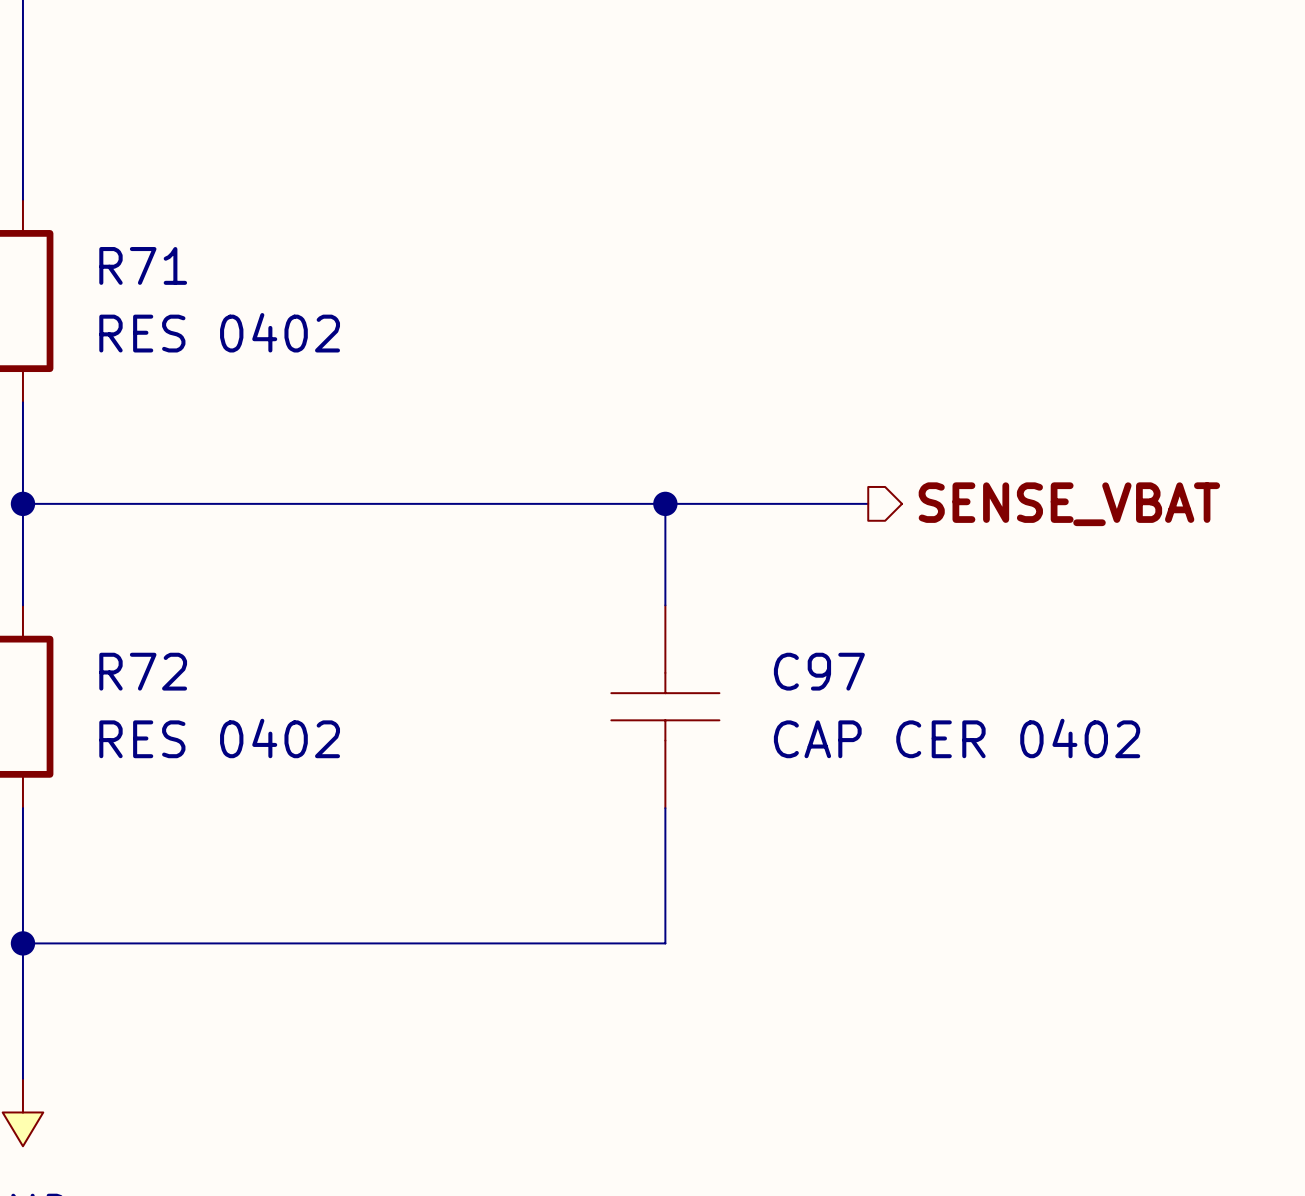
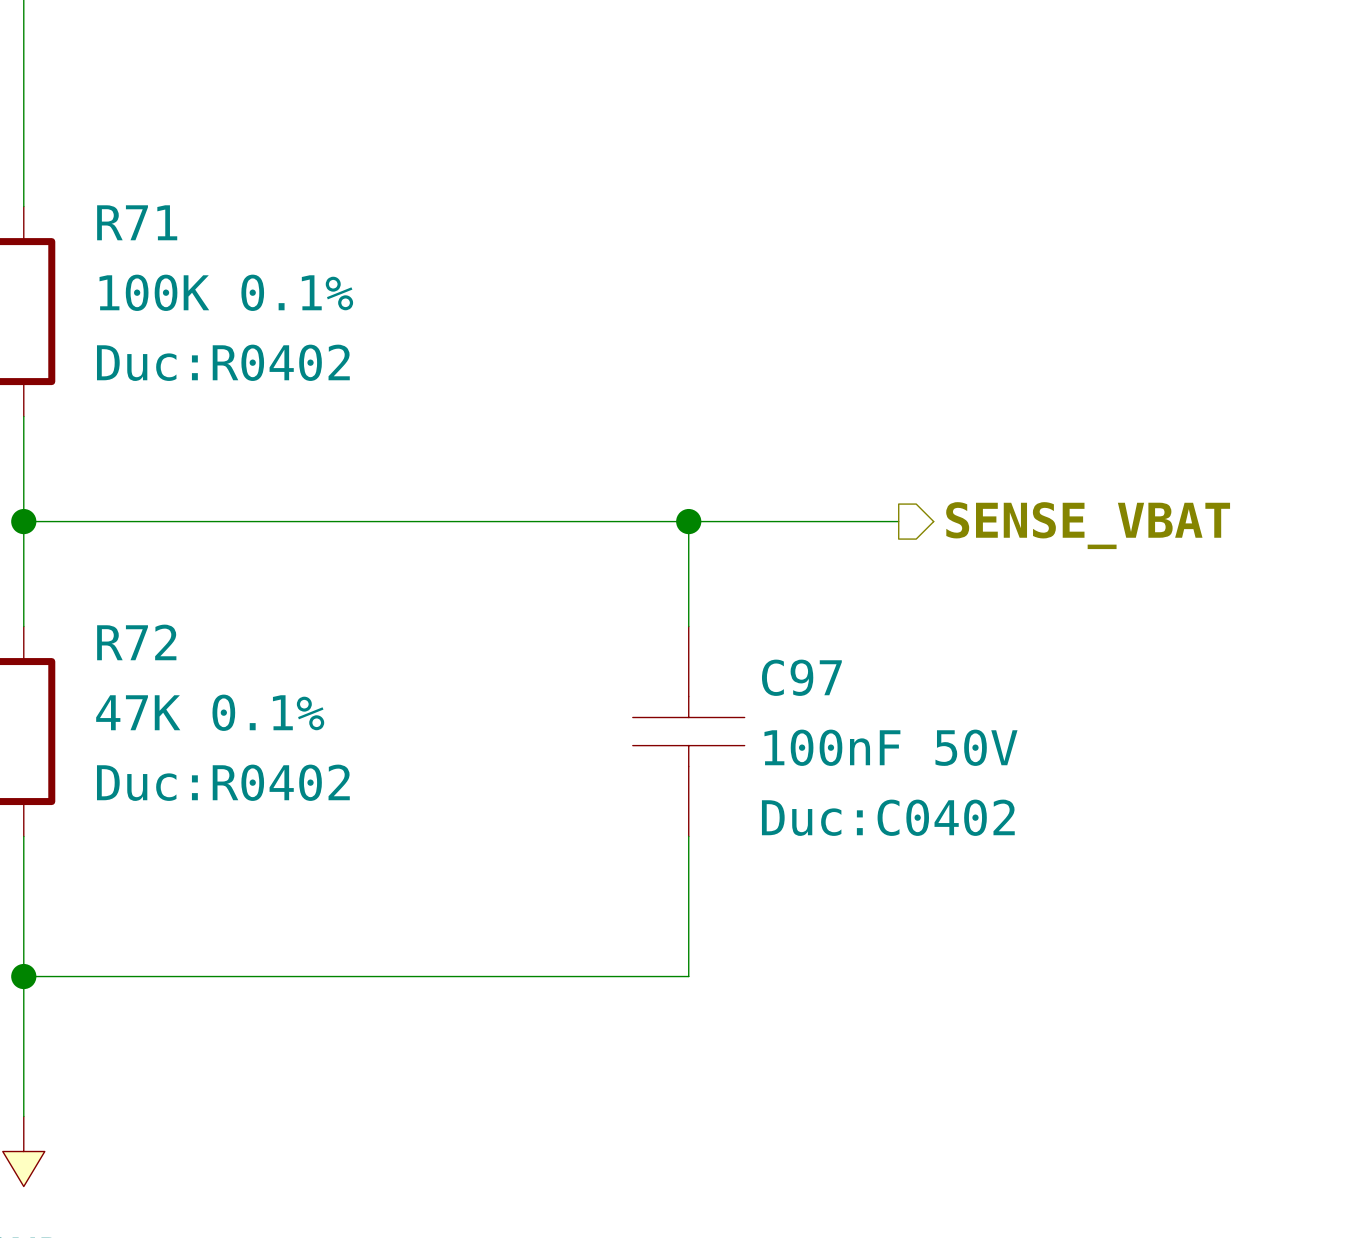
R71 name position: R71 (143, 265) -> R71 (137, 222)
R71 value: RES 0402 (219, 332) -> 100K 0.1% (226, 292)
R71 text: none -> Duc:R0402 (223, 362)
R72 name position: R72 (143, 671) -> R72 (136, 642)
C97 name position: C97 (819, 671) -> C97 (801, 677)
R72 value: RES 0402 (219, 738) -> 47K 0.1% (210, 712)
C97 value: CAP CER 0402 (957, 738) -> 100nF 50V (890, 747)
R72 text: none -> Duc:R0402 (223, 782)
C97 text: none -> Duc:C0402 (888, 817)

